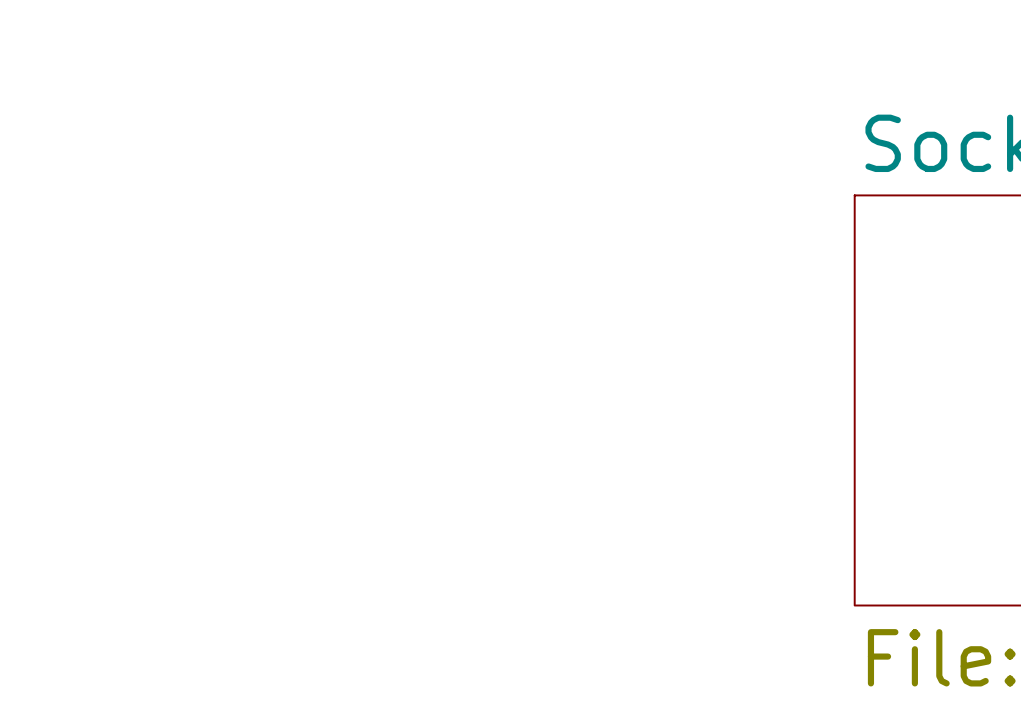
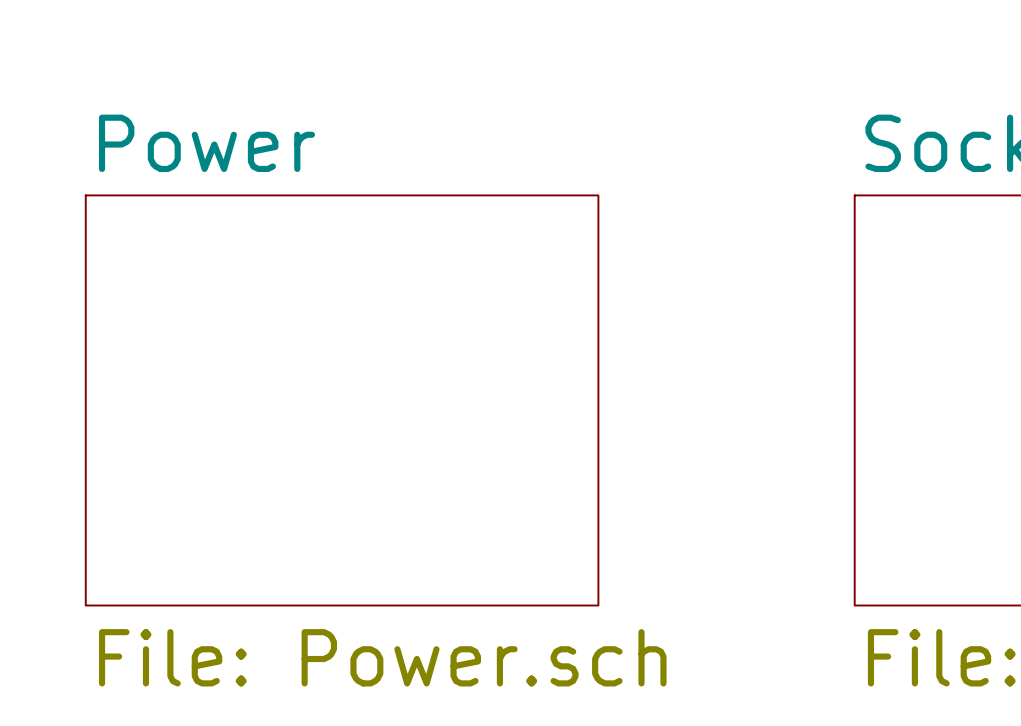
sheet Power: none -> File: Power.sch (342, 400)

